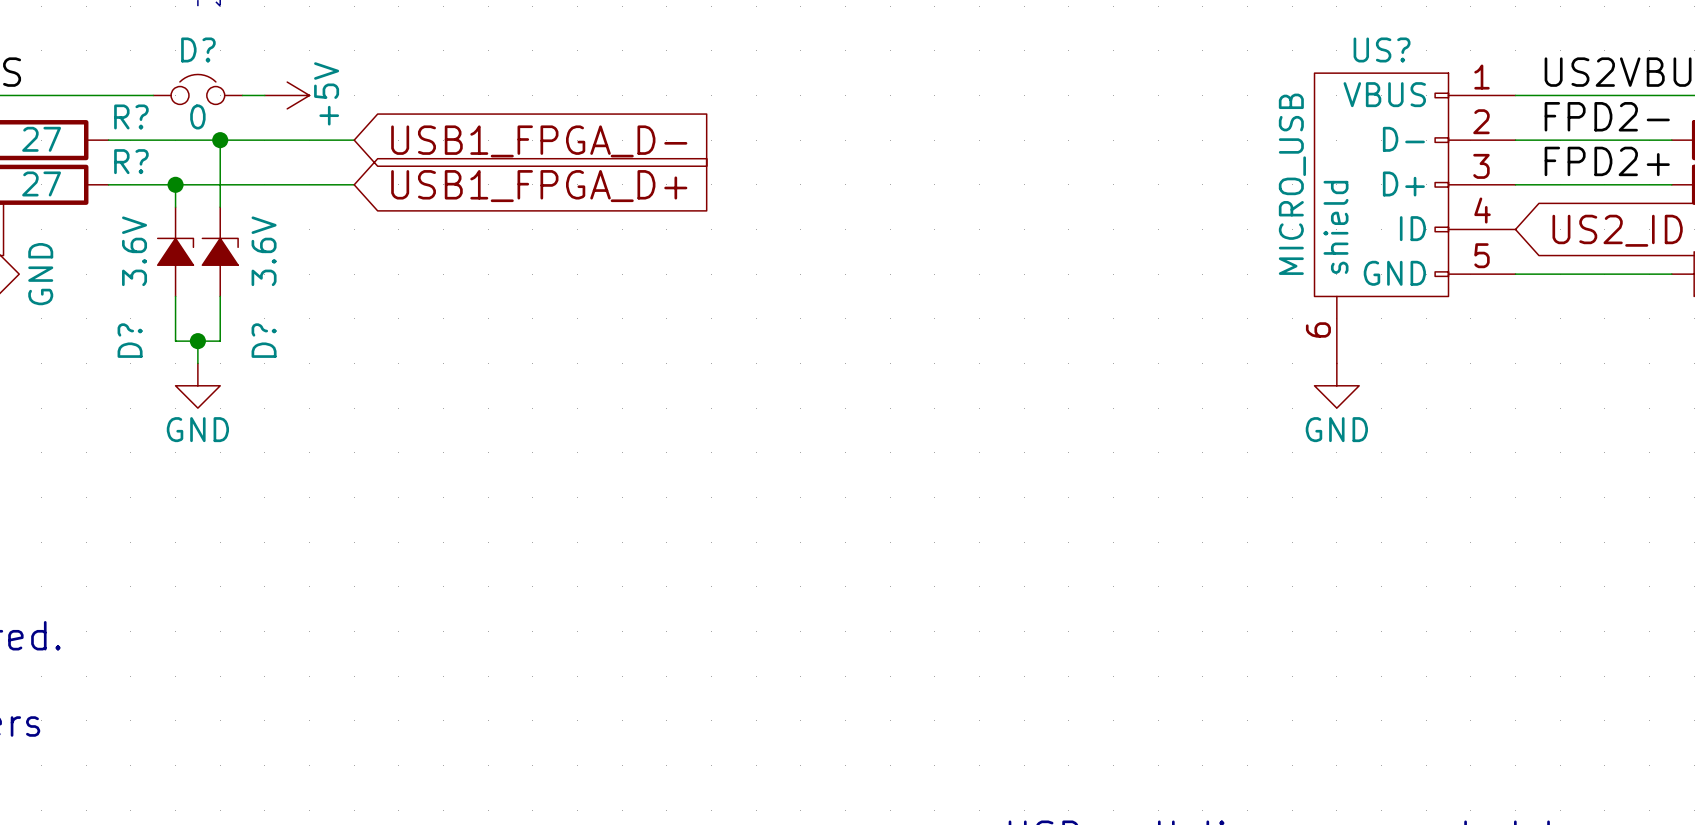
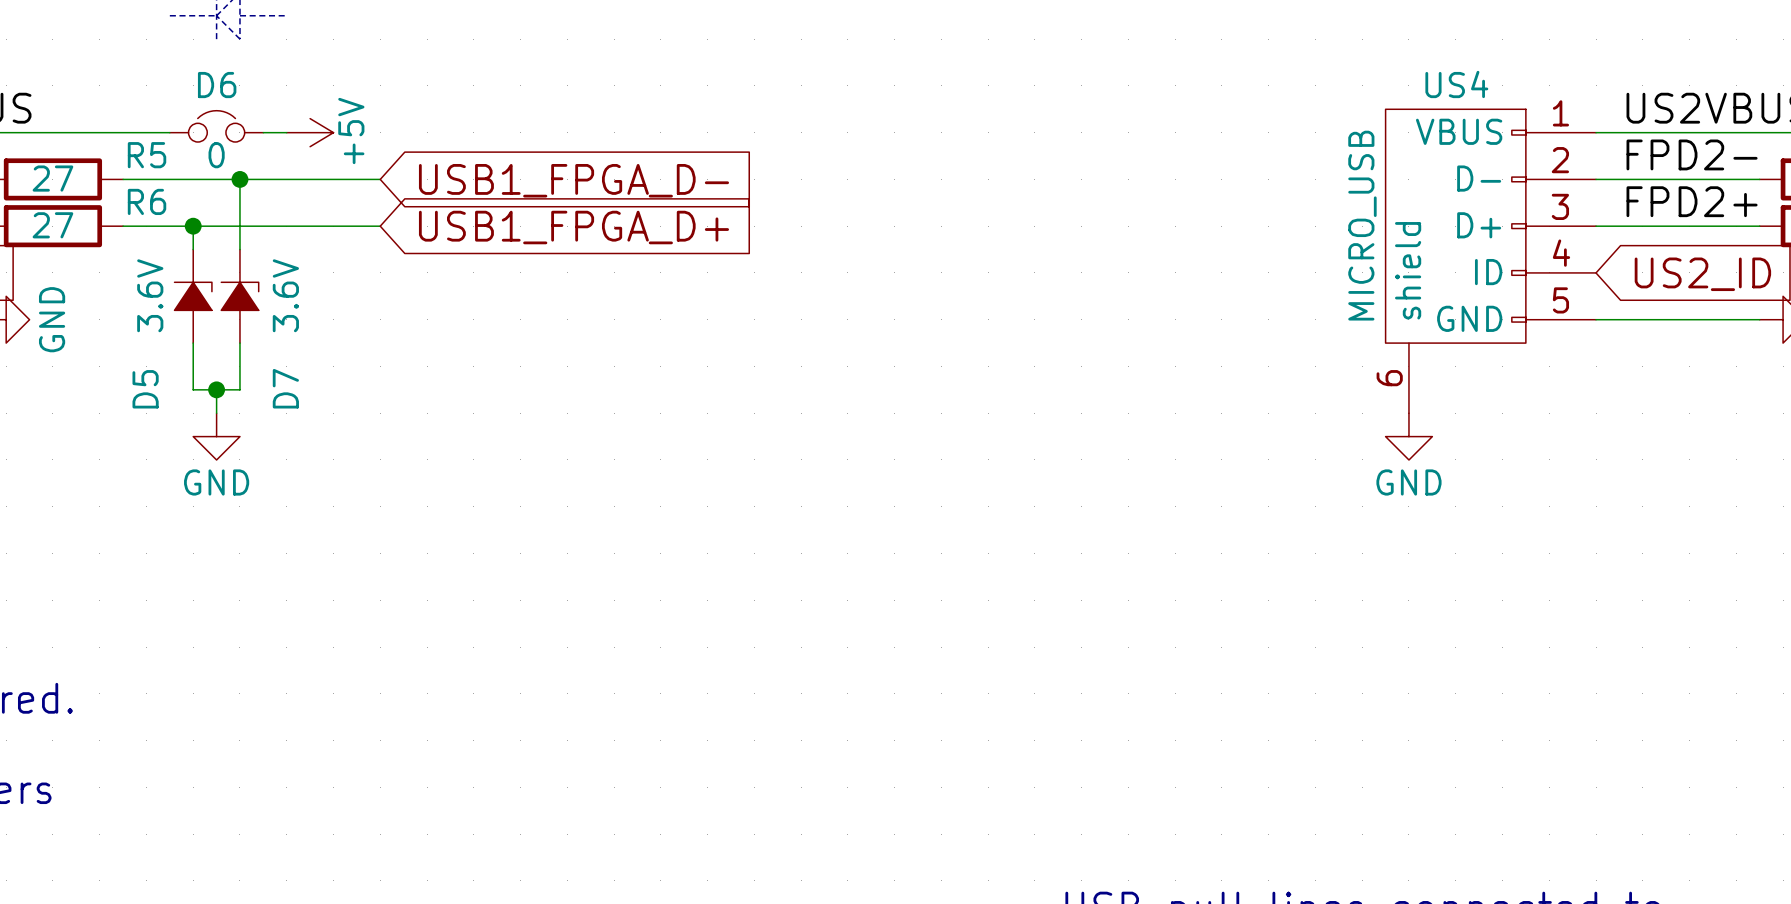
D? name: D? (198, 49) -> D6 (217, 85)
US? name: US? (1382, 49) -> US4 (1456, 84)
R? name: R? (131, 116) -> R5 (147, 155)
R? name: R? (131, 161) -> R6 (147, 201)
D? name: D? (130, 340) -> D5 (145, 389)
D? name: D? (264, 340) -> D7 (285, 388)

